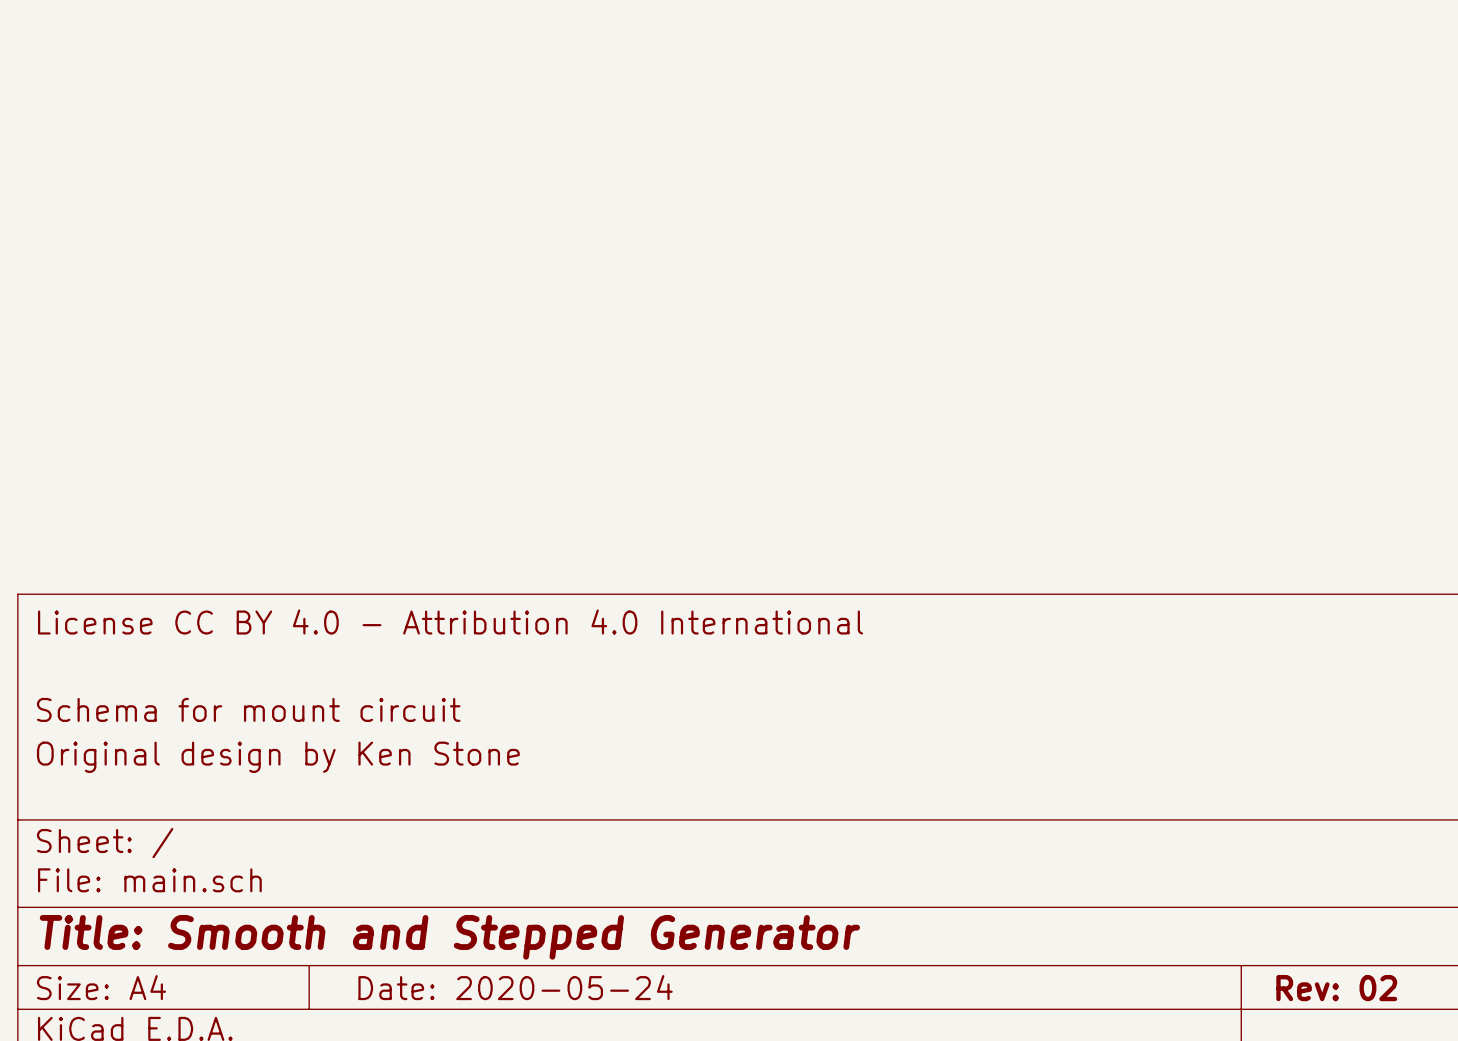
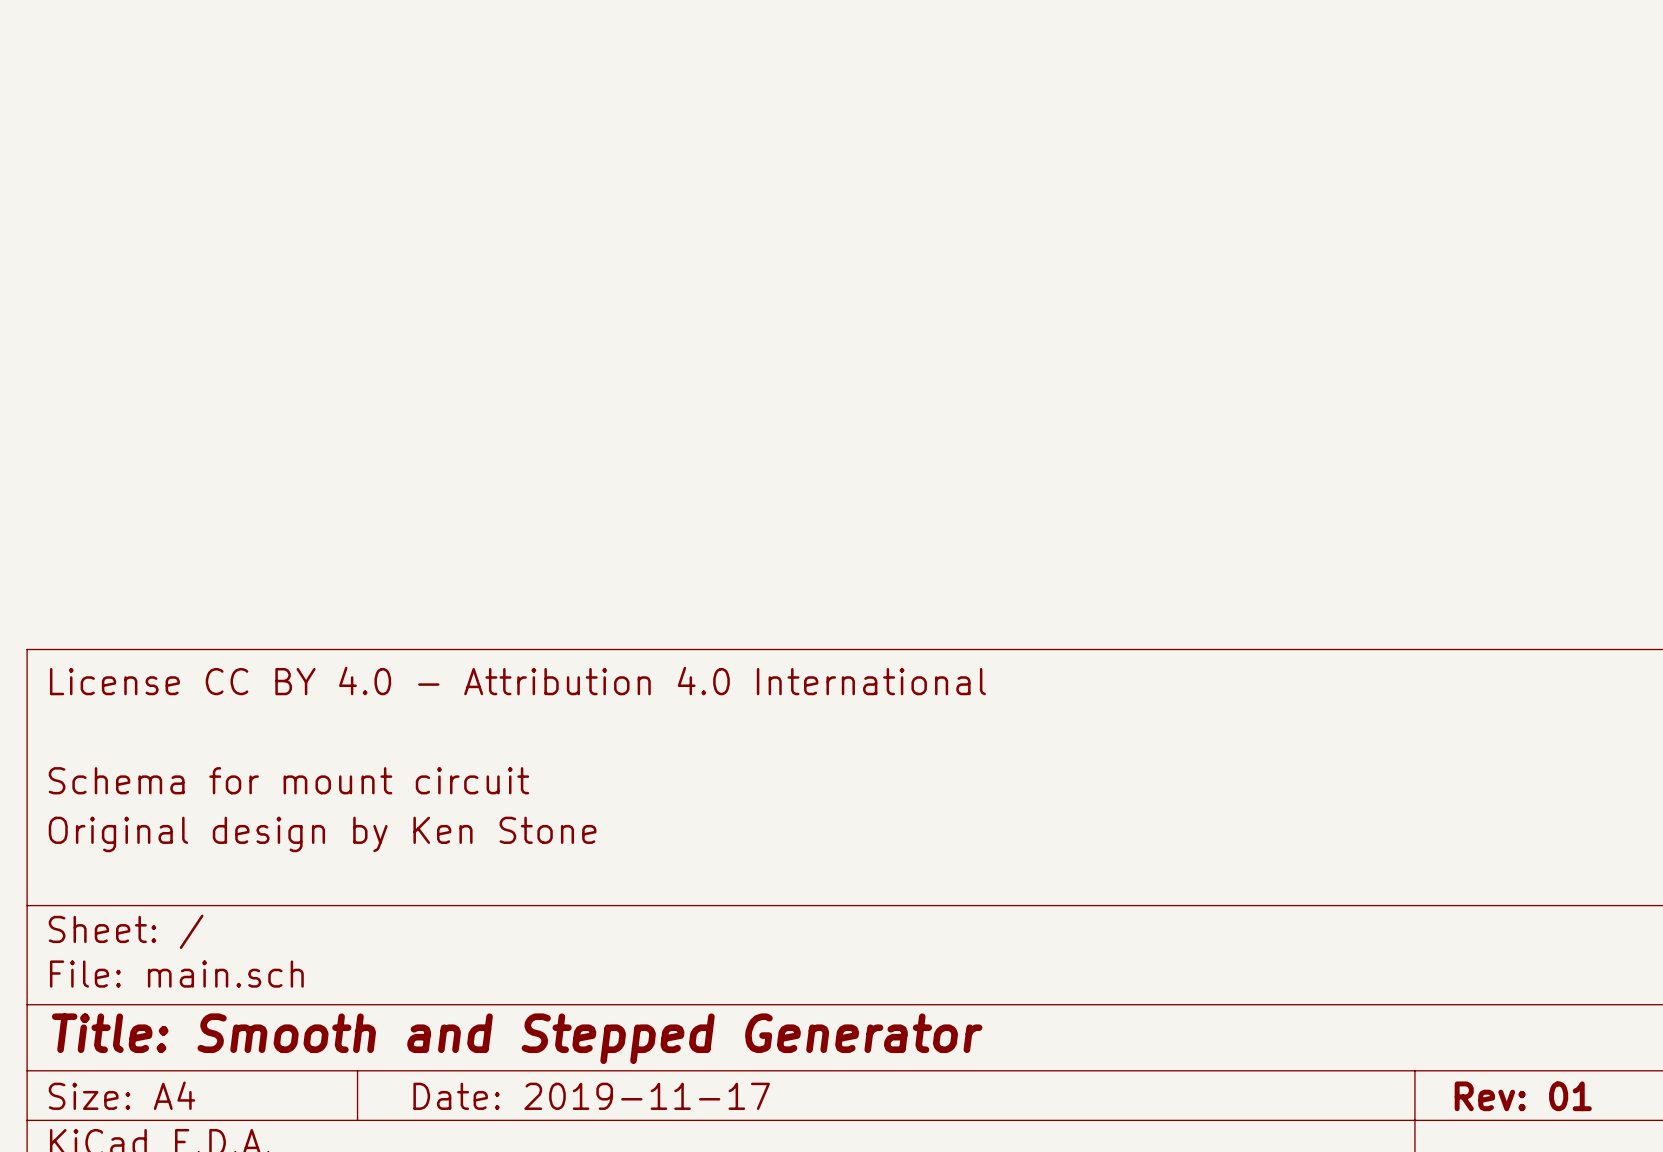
title block: Date: 2020-05-24 (515, 987) -> Date: 2019-11-17 (591, 1096)
title block: Rev: 02 (1336, 988) -> Rev: 01 (1523, 1096)

